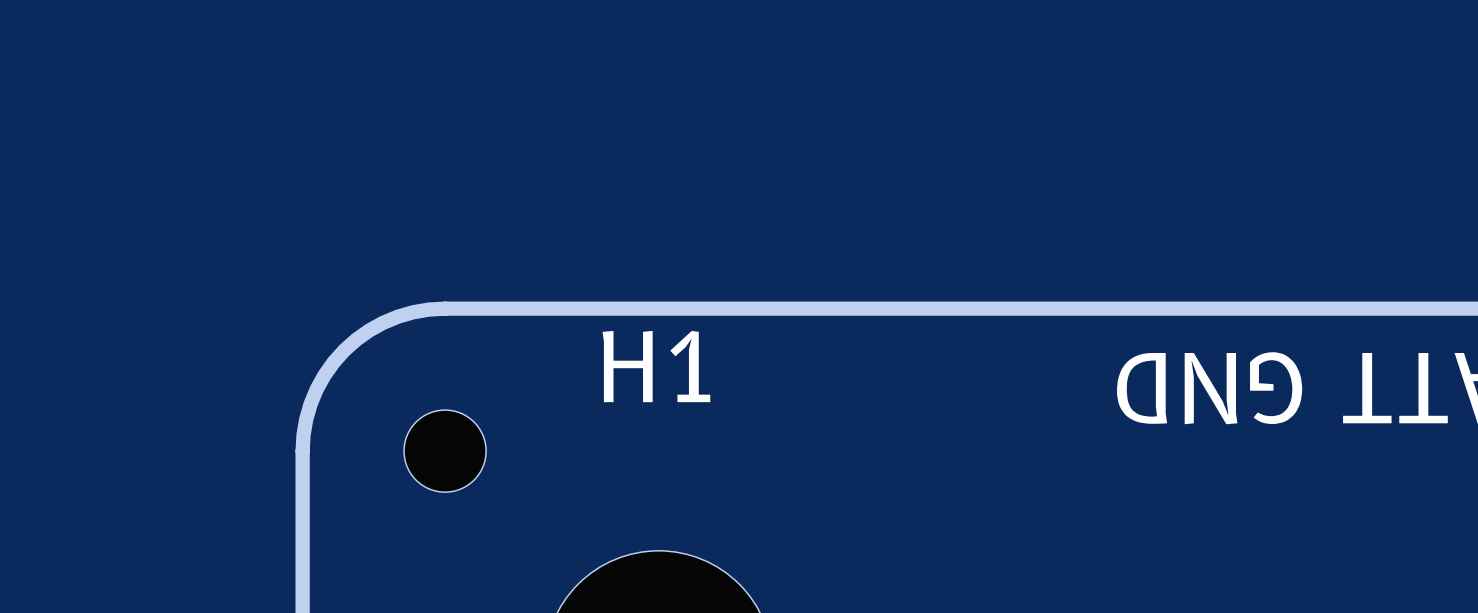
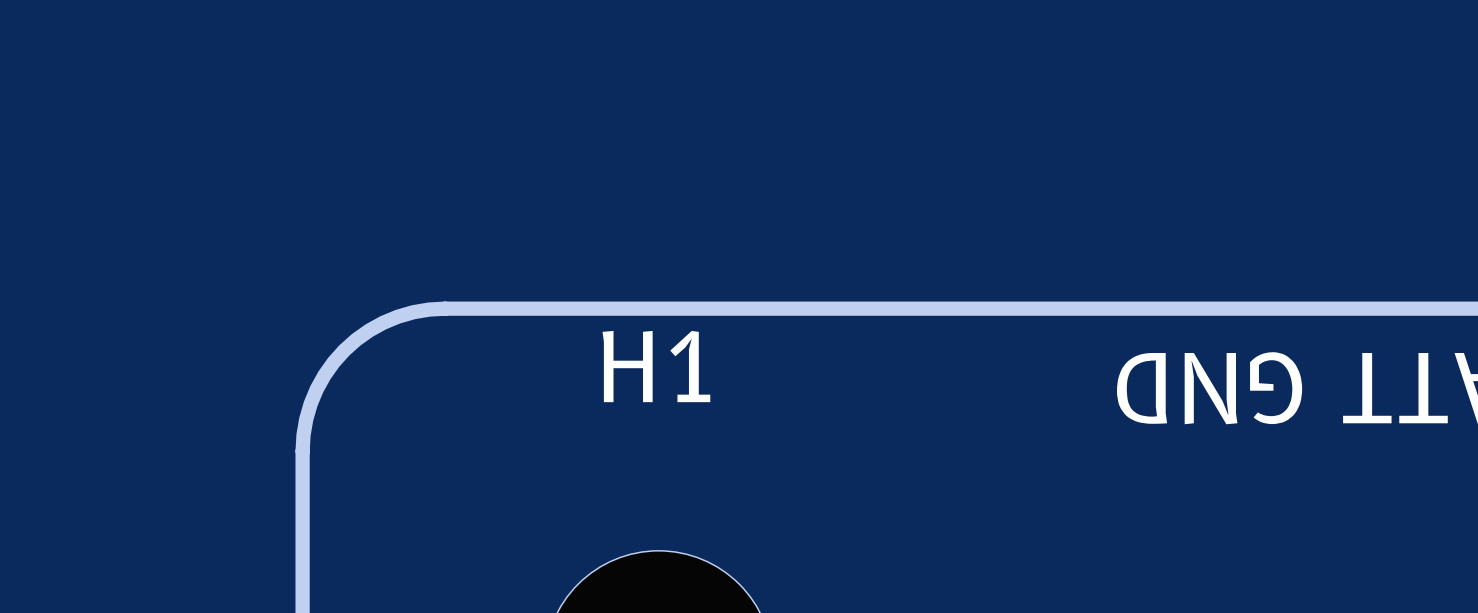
part: (445, 451) -> none

